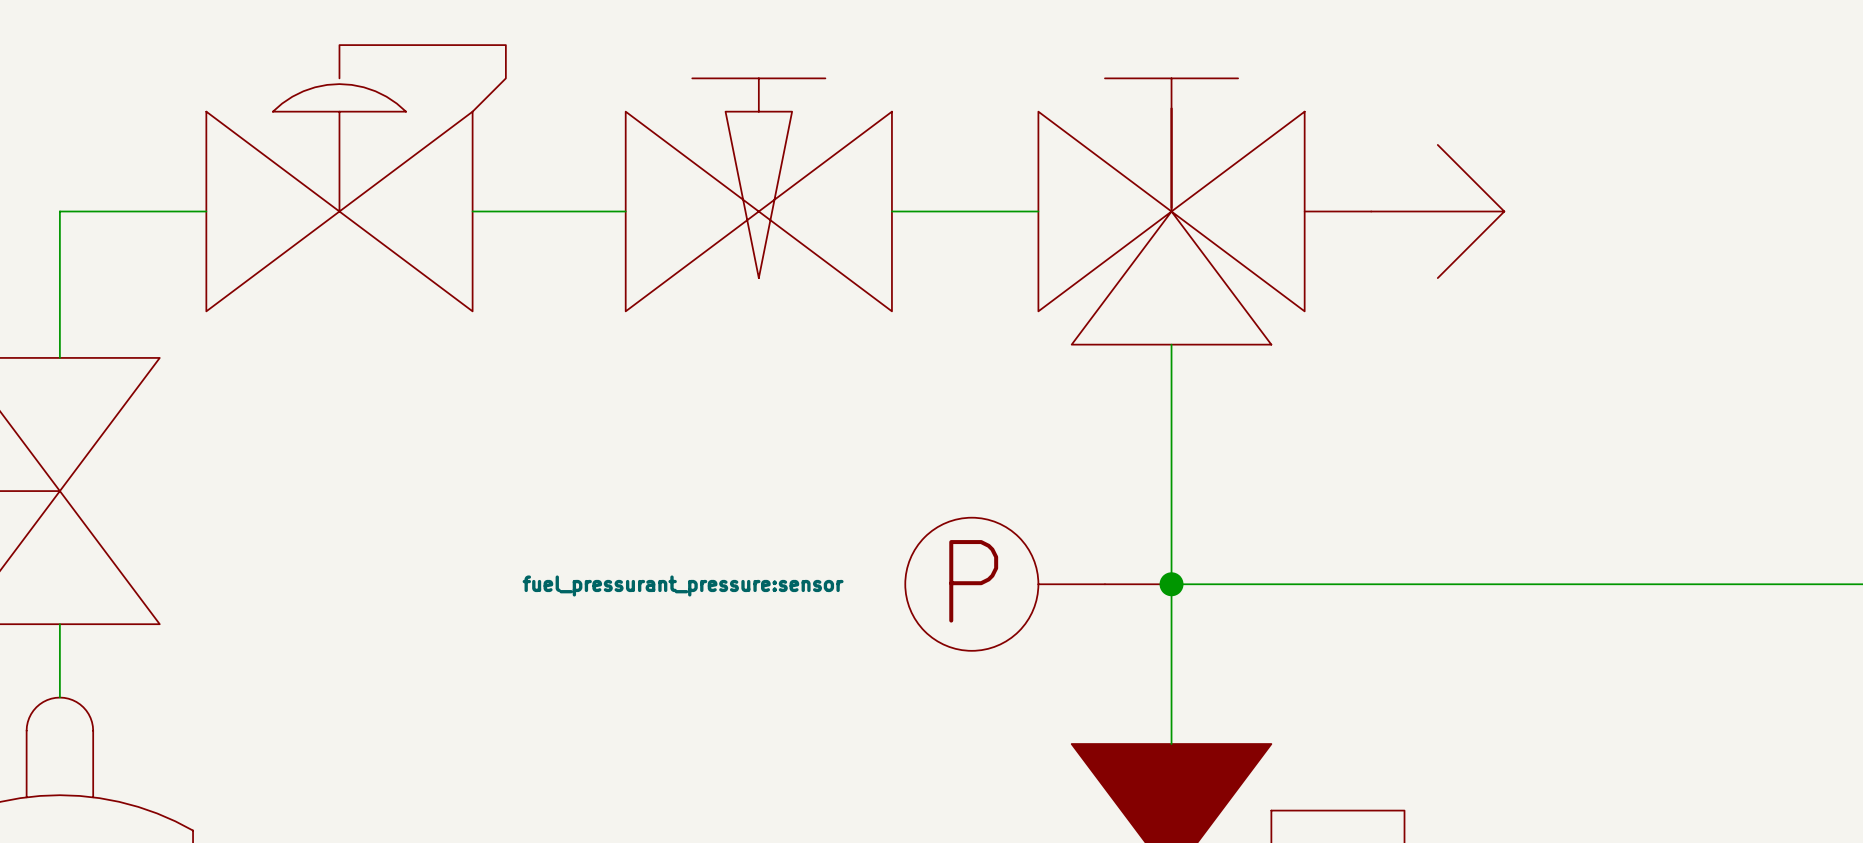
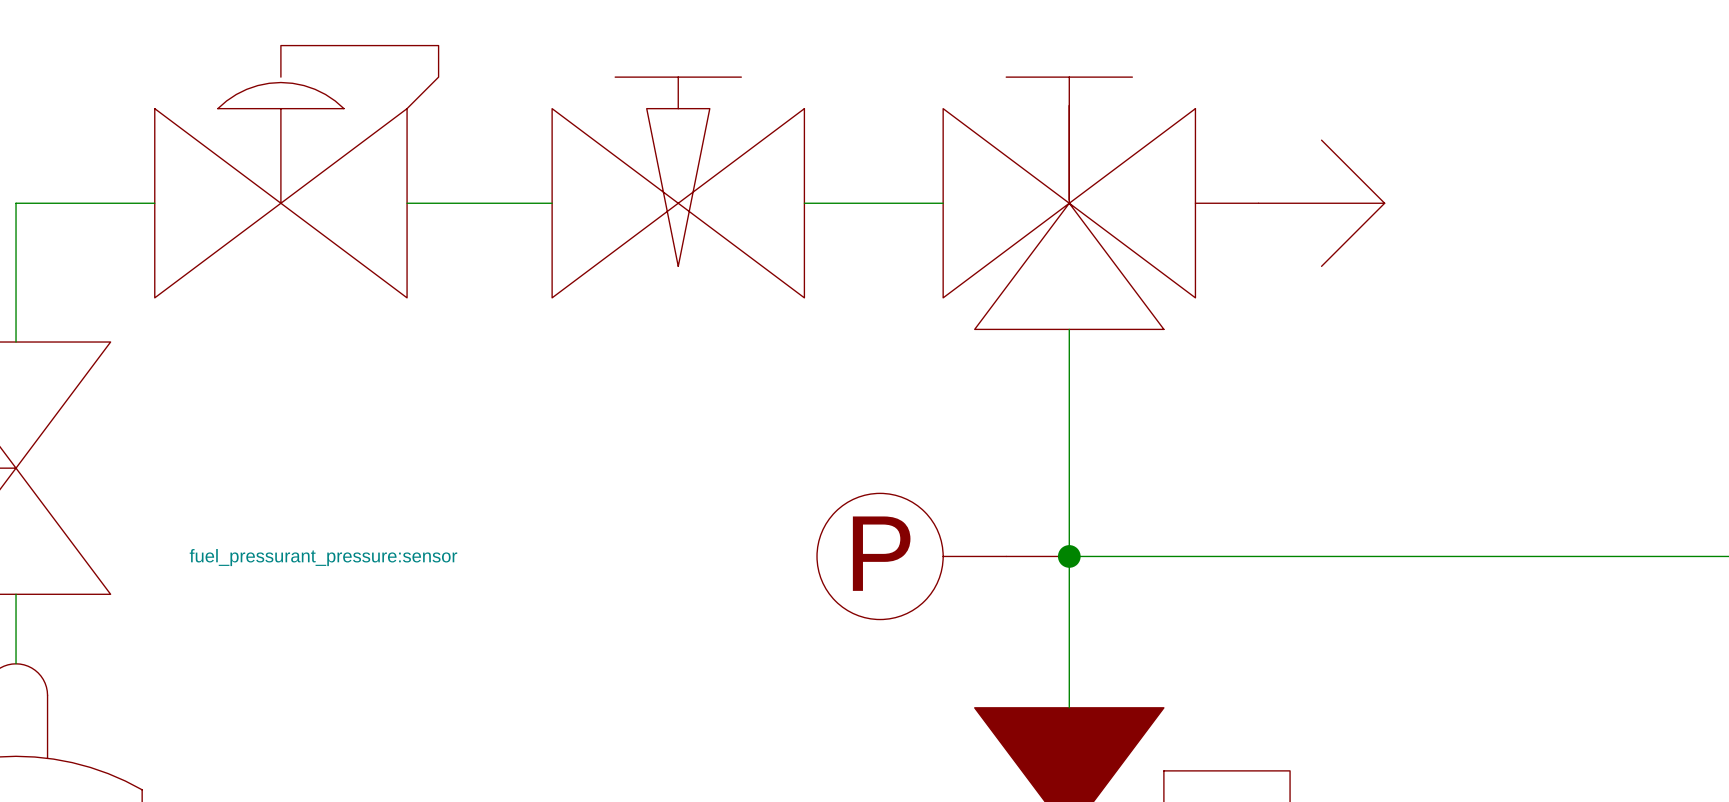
part value position: fuel_pressurant_pressure:sensor (683, 585) -> fuel_pressurant_pressure:sensor (323, 557)

